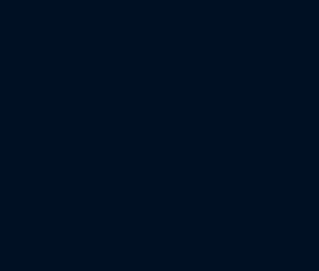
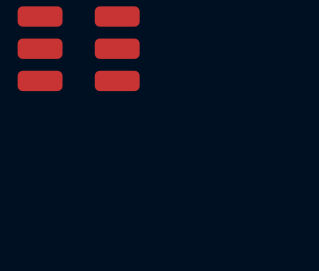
part: none -> (78, 48)

